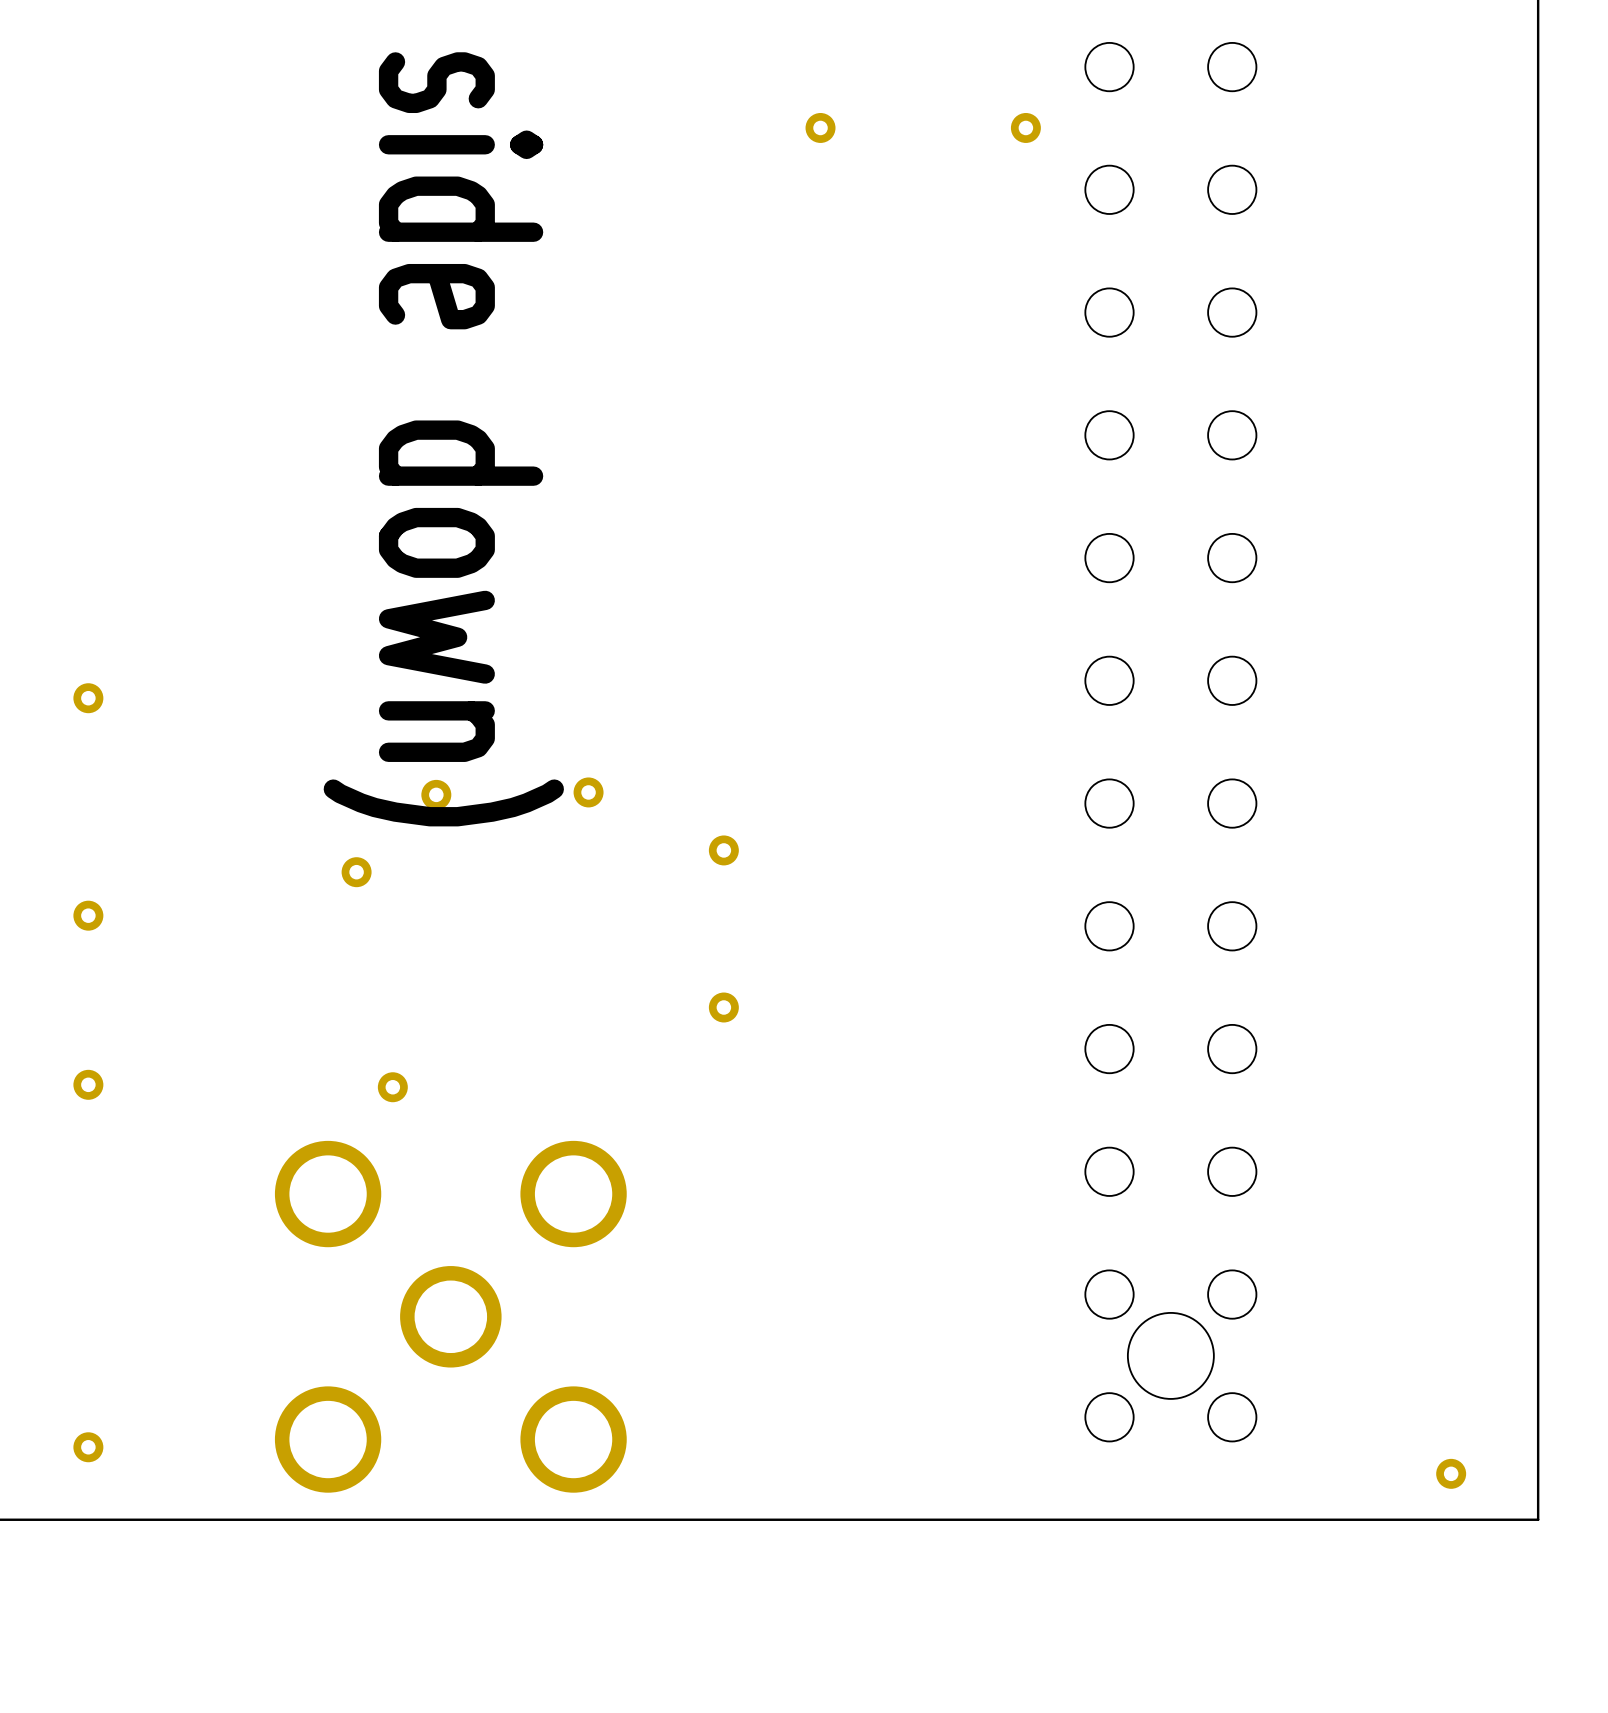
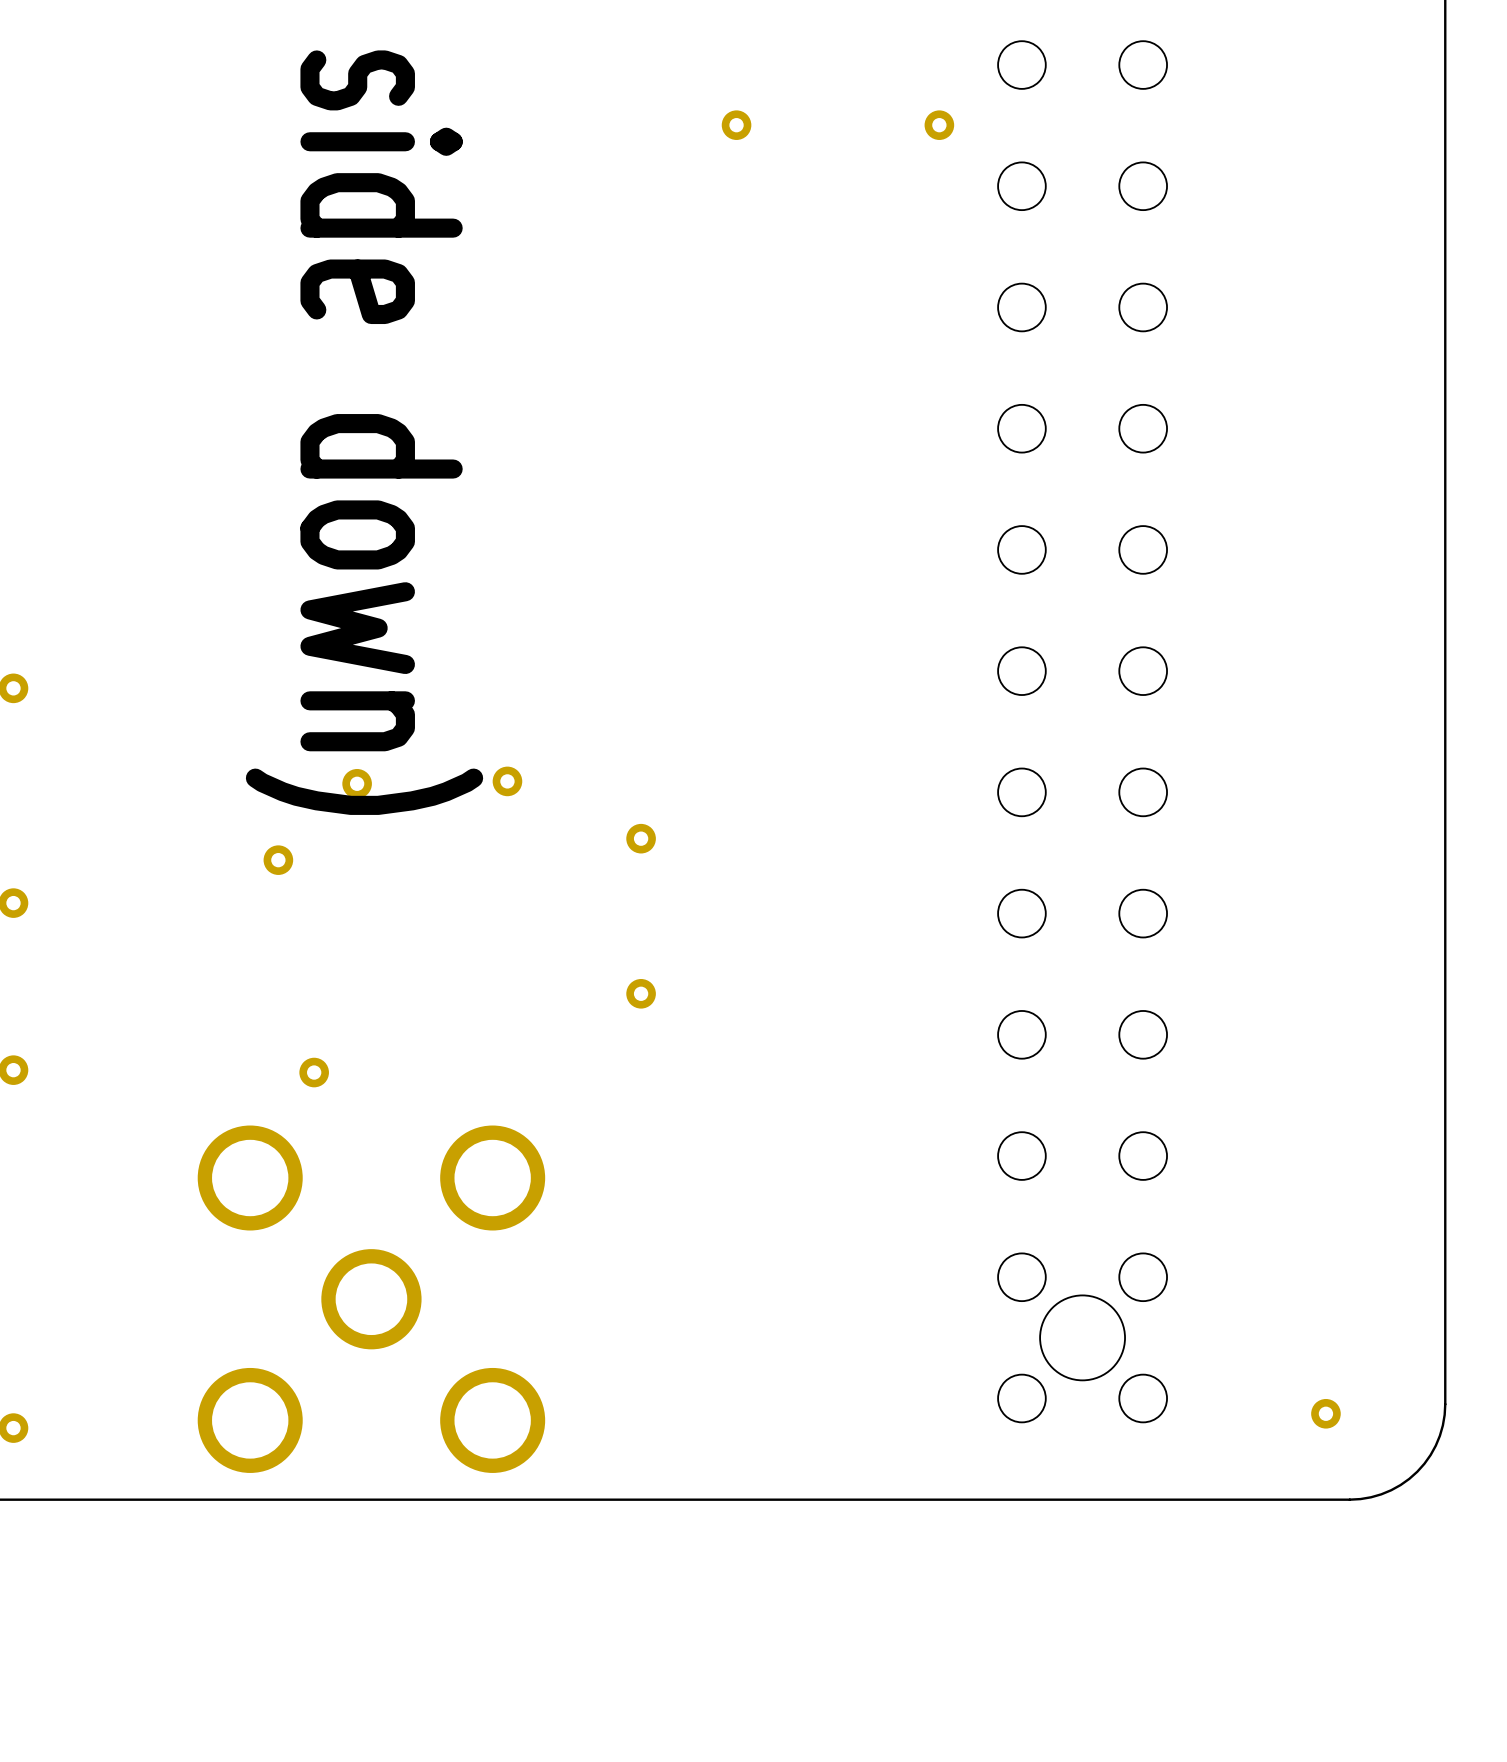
board edge: (1538, 1423) (1538, 1519) (1441, 1519) -> (1445, 1404) (1439, 1435) (1430, 1455) (1417, 1471) (1400, 1485) (1381, 1494) (1349, 1499)
part position: (1451, 1473) -> (1325, 1413)

